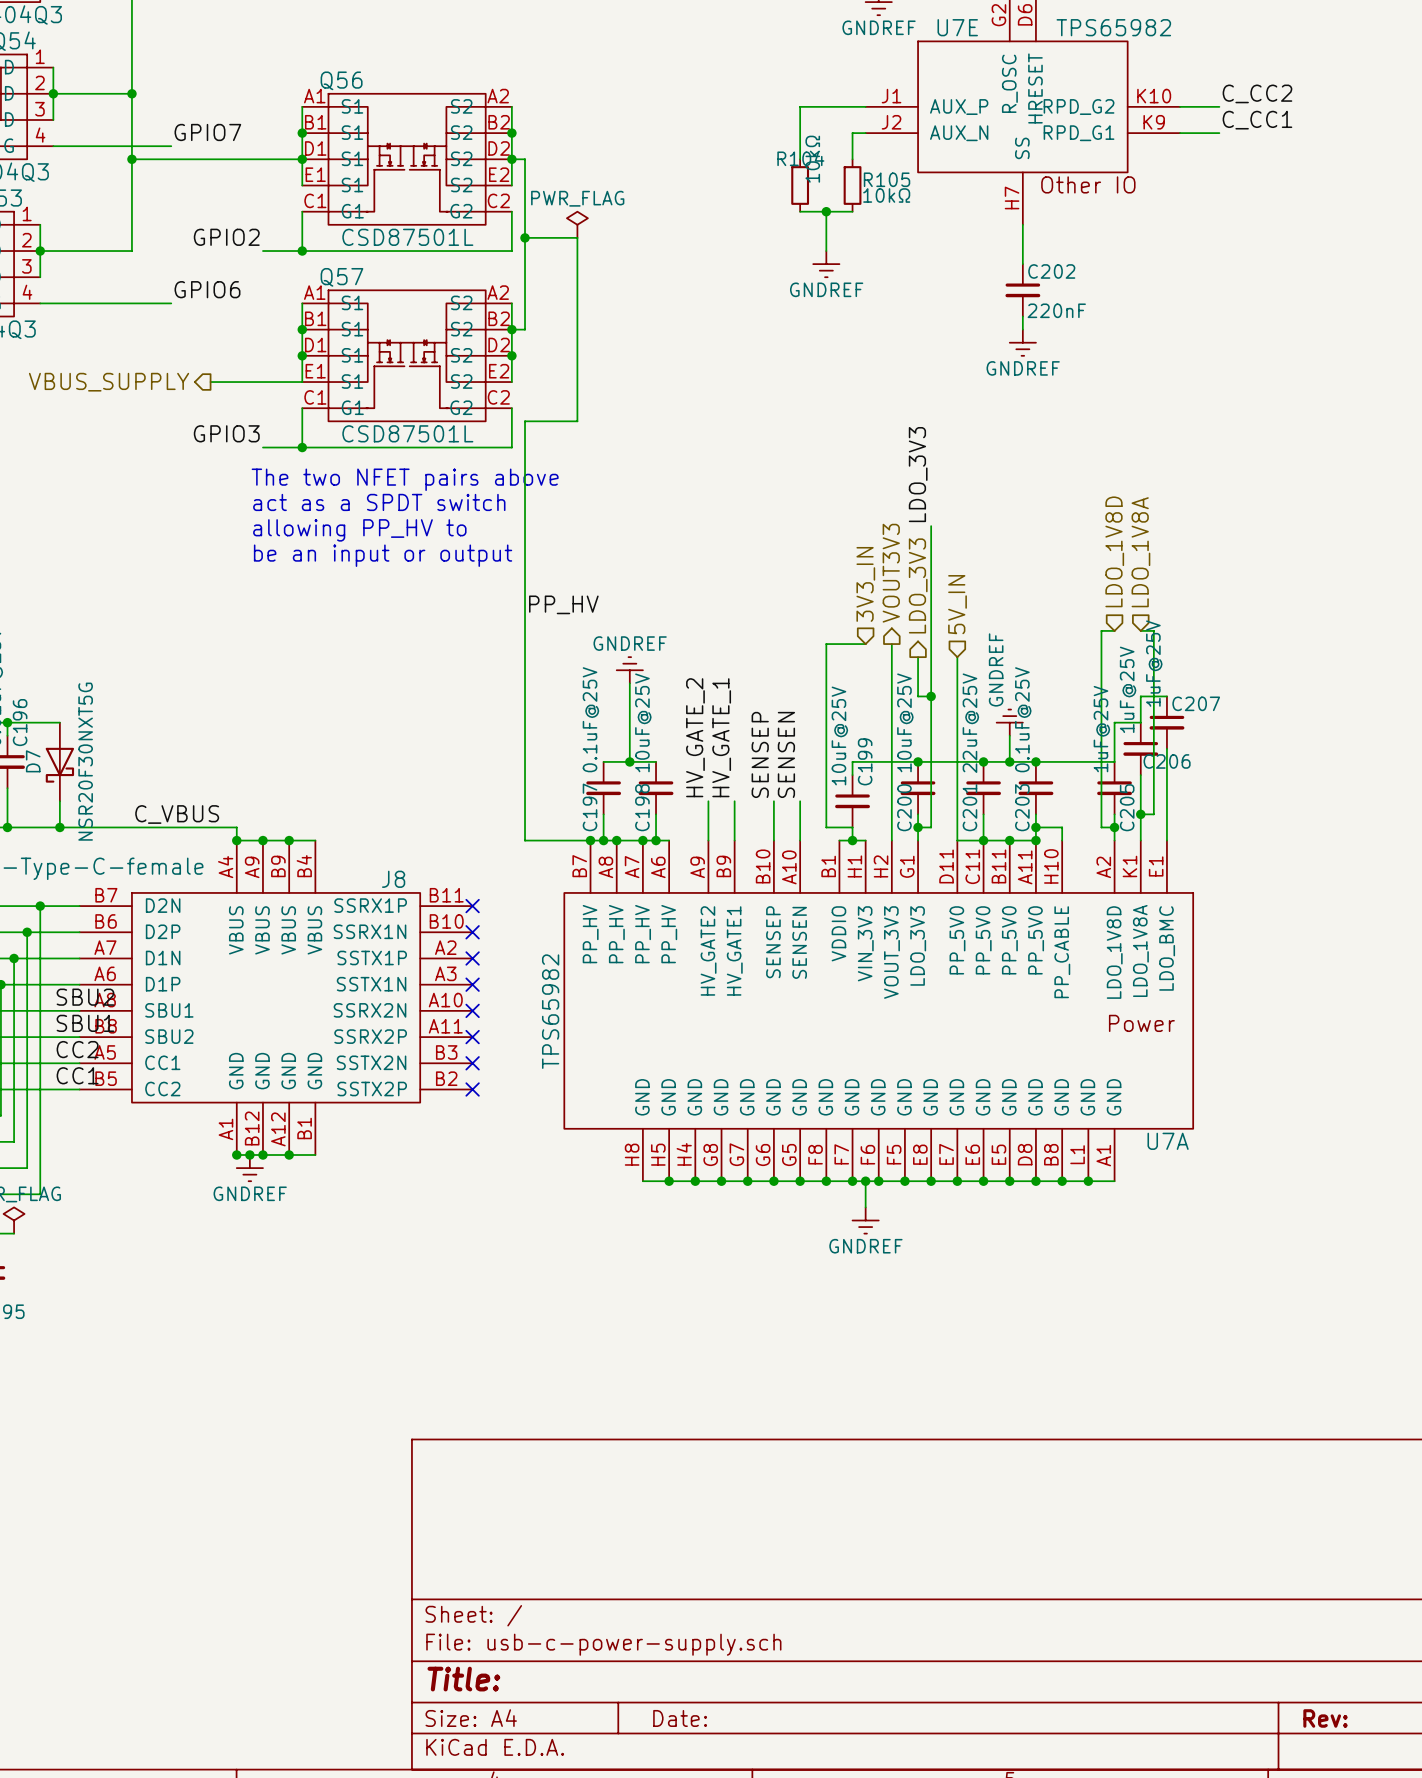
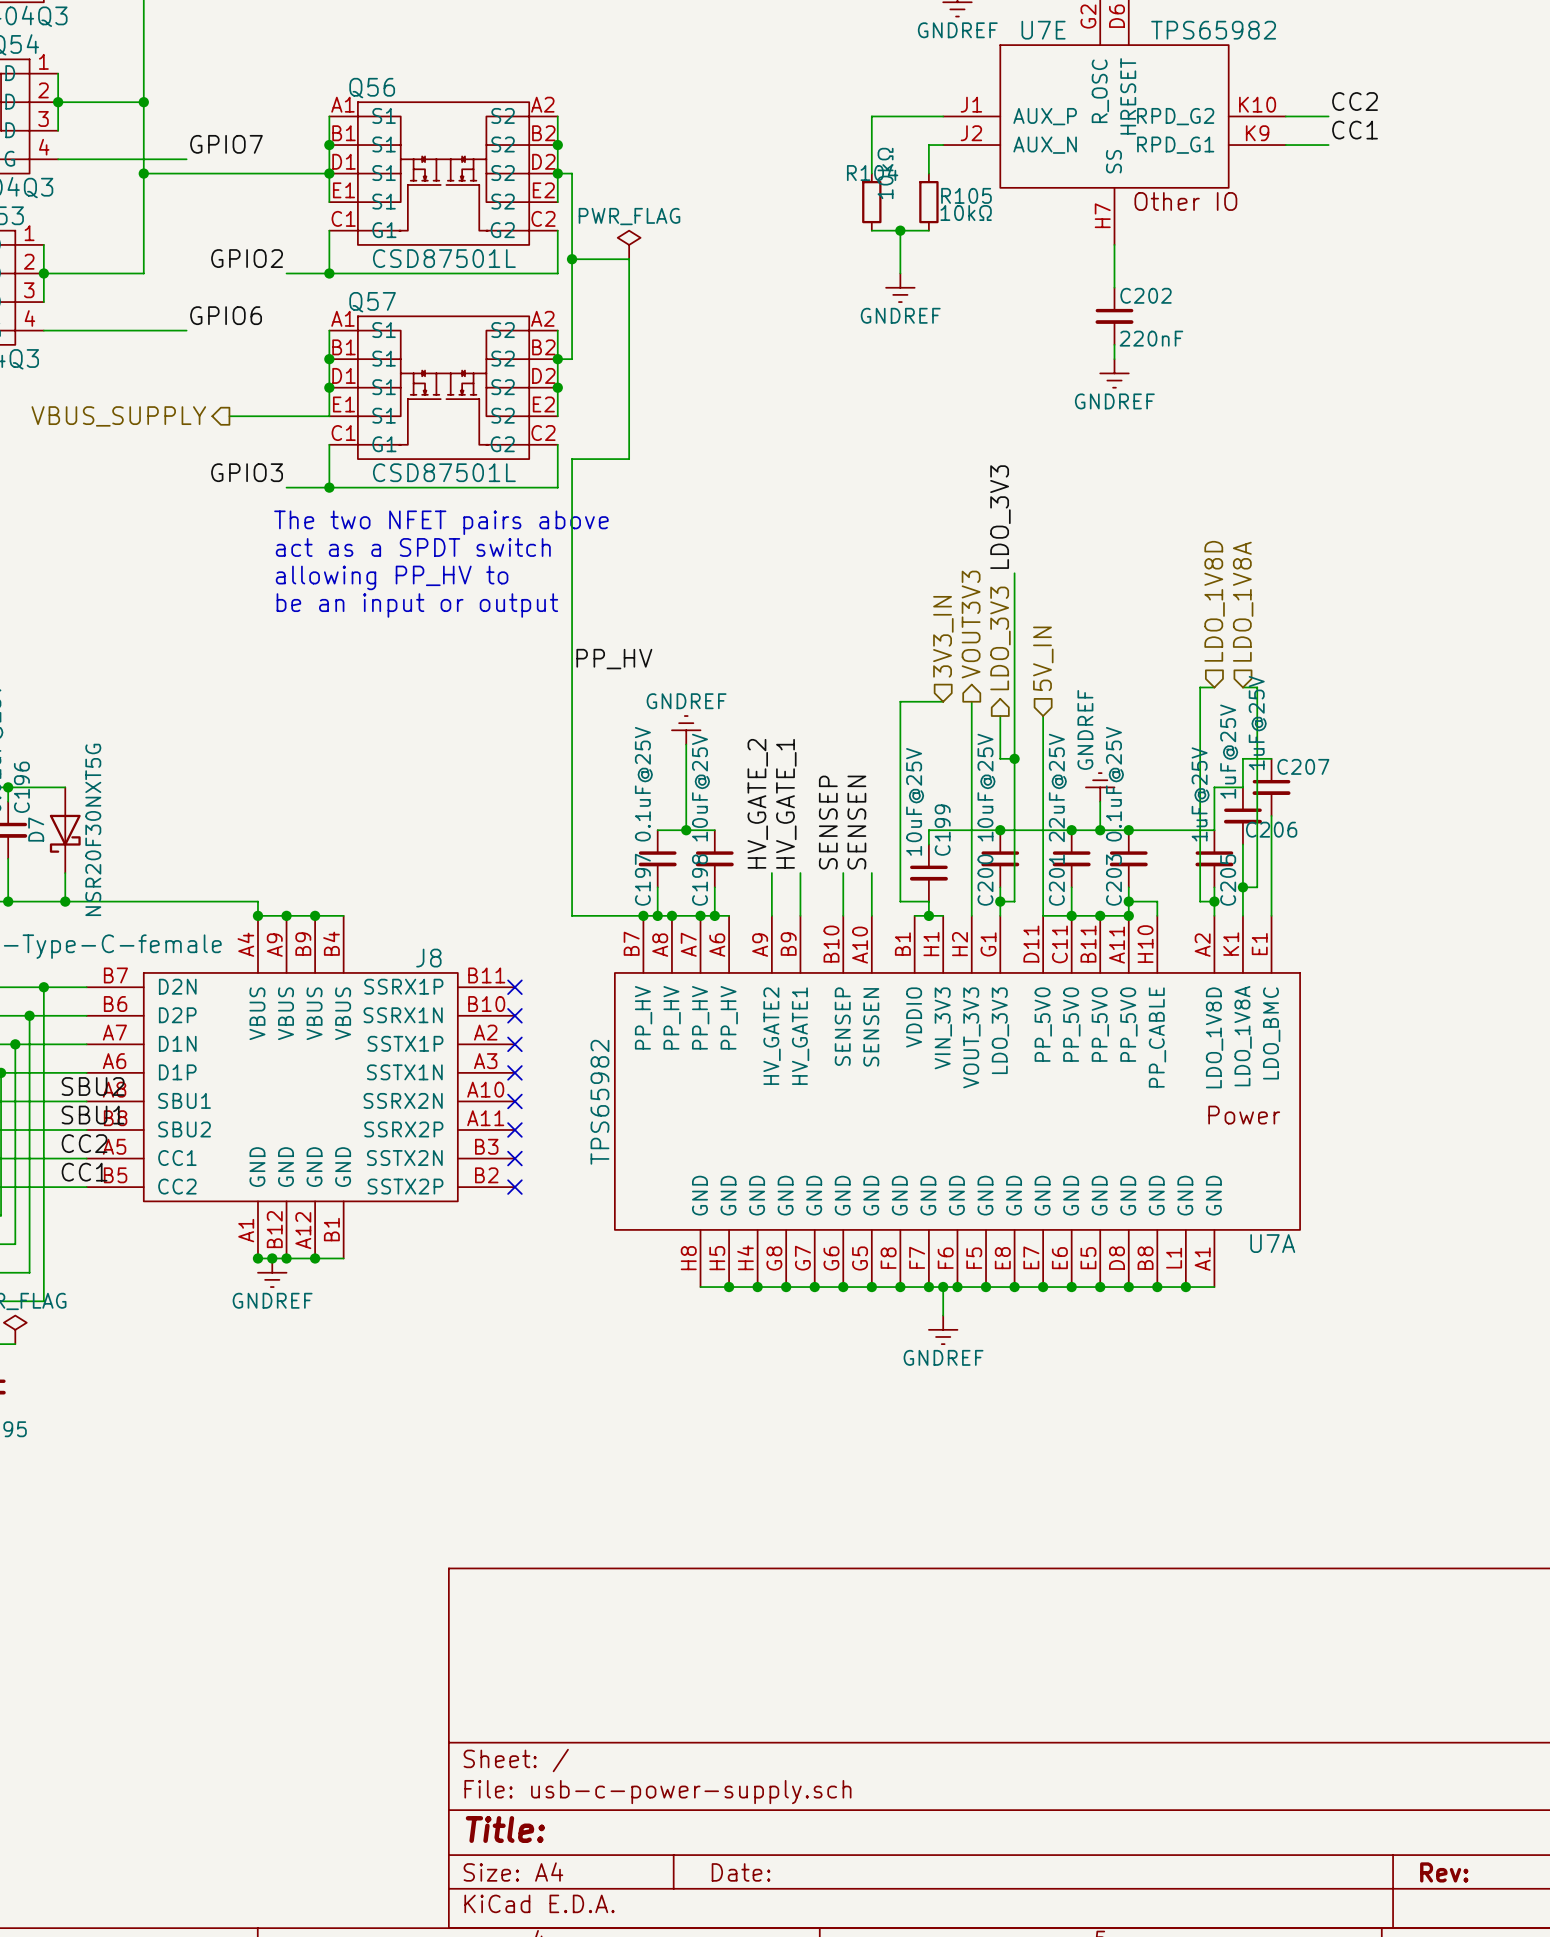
label: C_CC2 (1257, 93) -> CC2 (1355, 101)
label: C_CC1 (1257, 120) -> CC1 (1355, 130)
label: C_VBUS (177, 814) -> none

